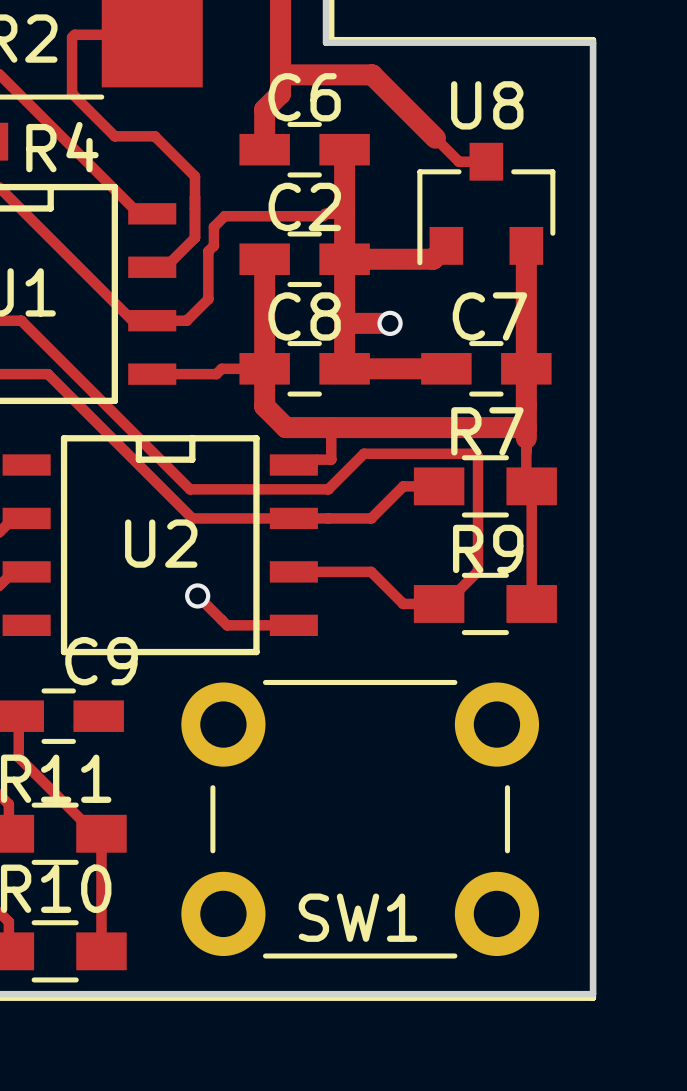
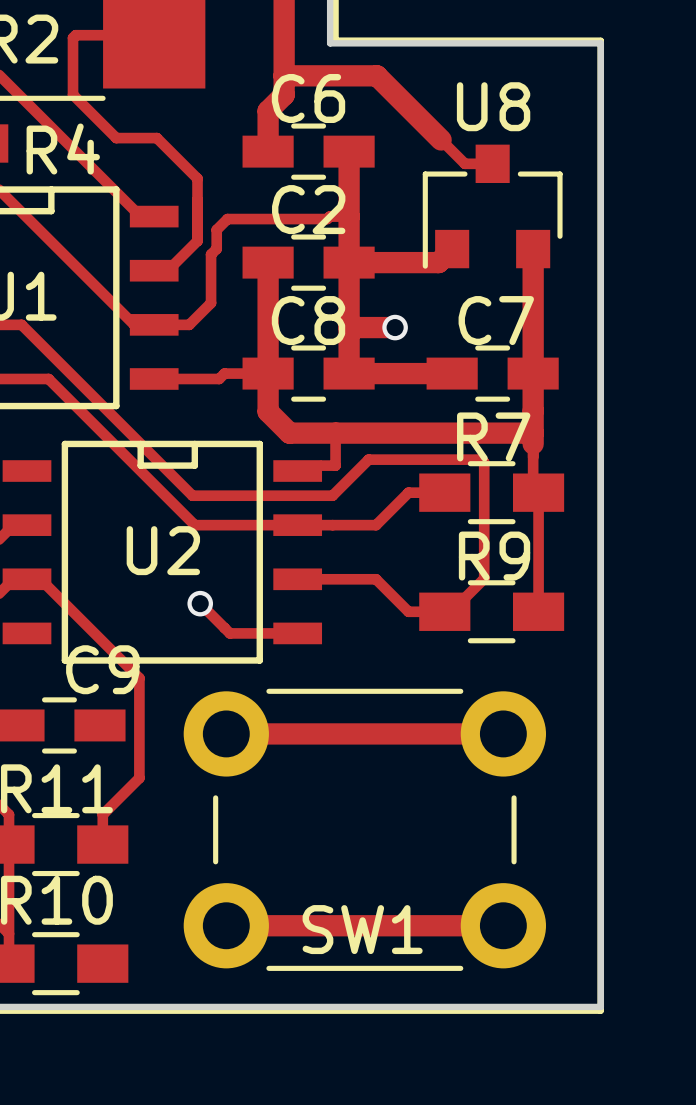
track: none -> (40, 579) (139, 678) (139, 778) (102, 814) (102, 844)
track: (18, 716) (18, 757) (95, 833) (101, 833) (101, 951) -> none
track: none -> (237, 733) (514, 733)
track: none -> (9, 844) (9, 933)
track: none -> (237, 925) (514, 925)

